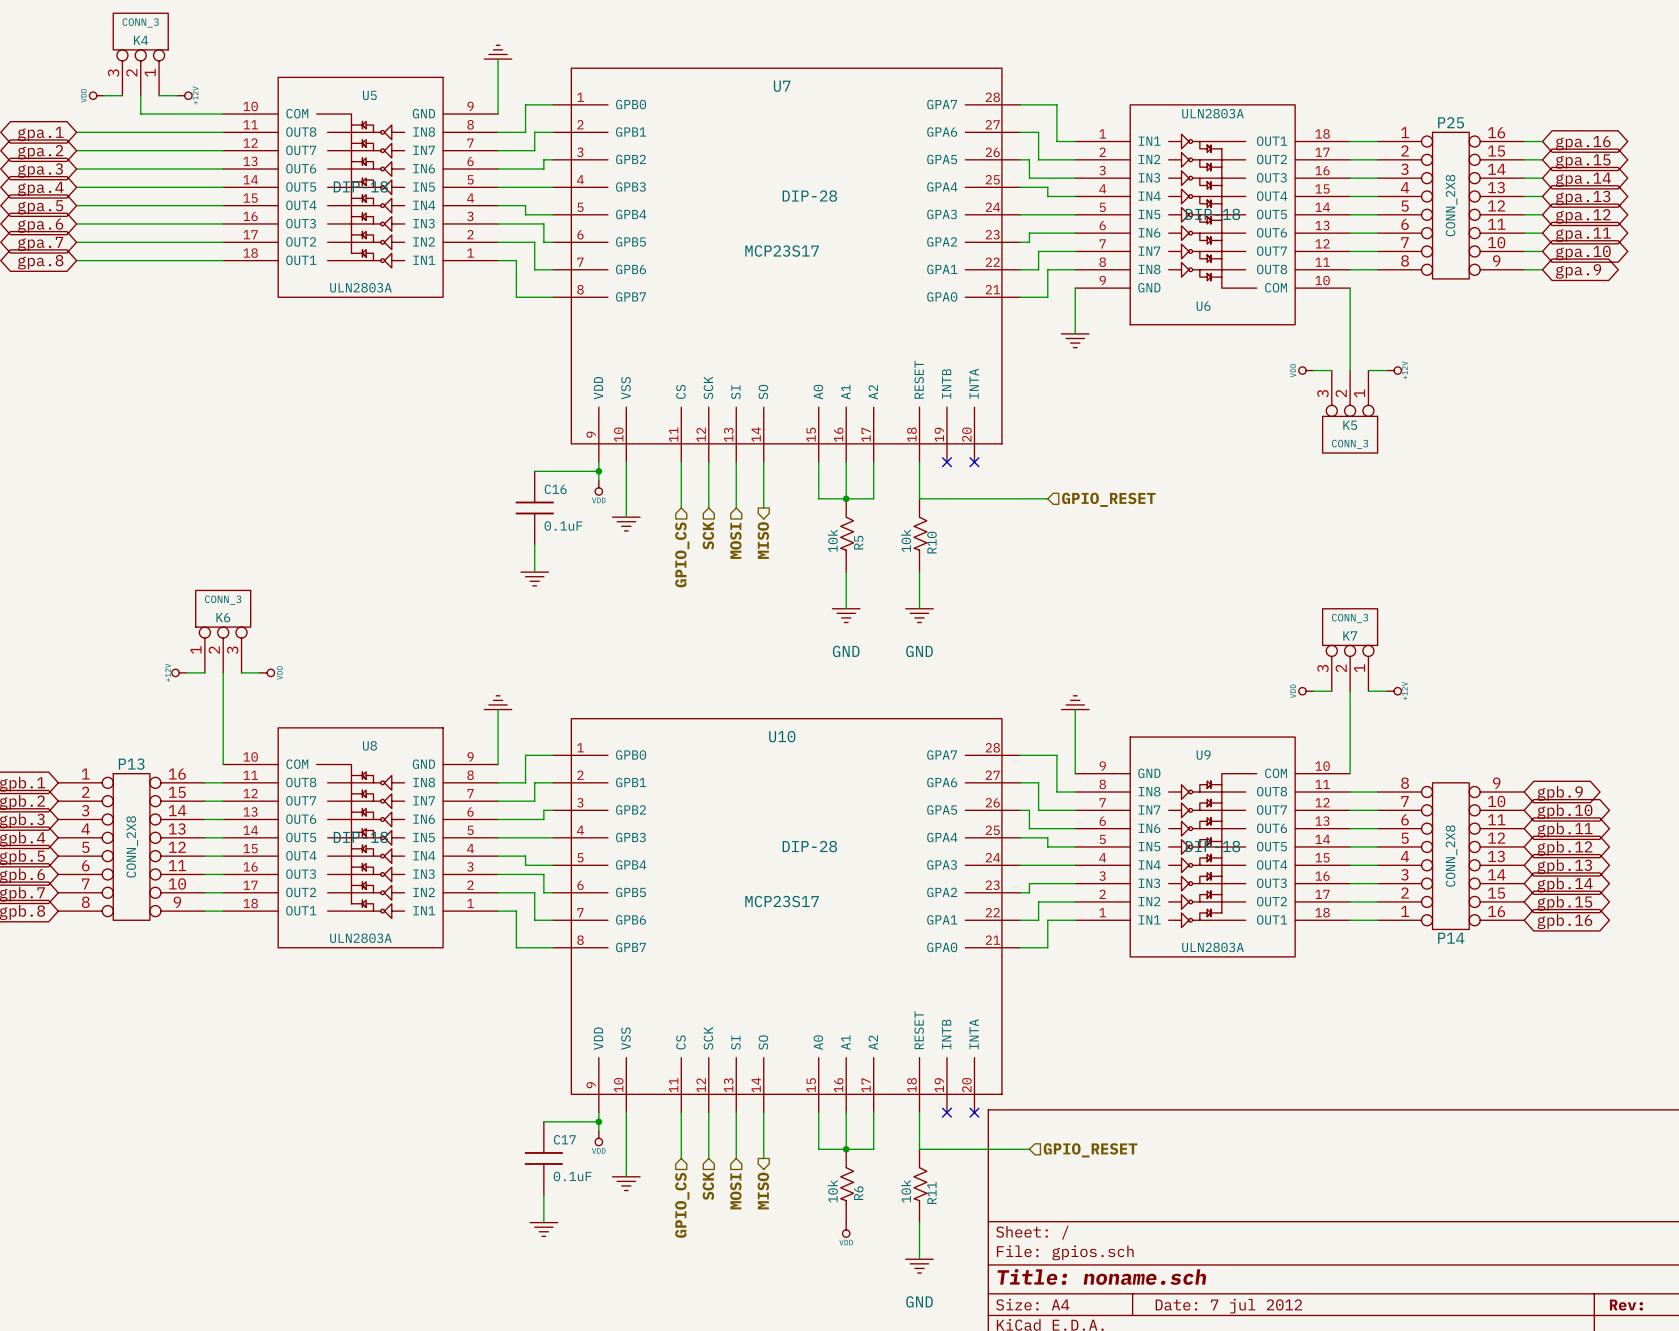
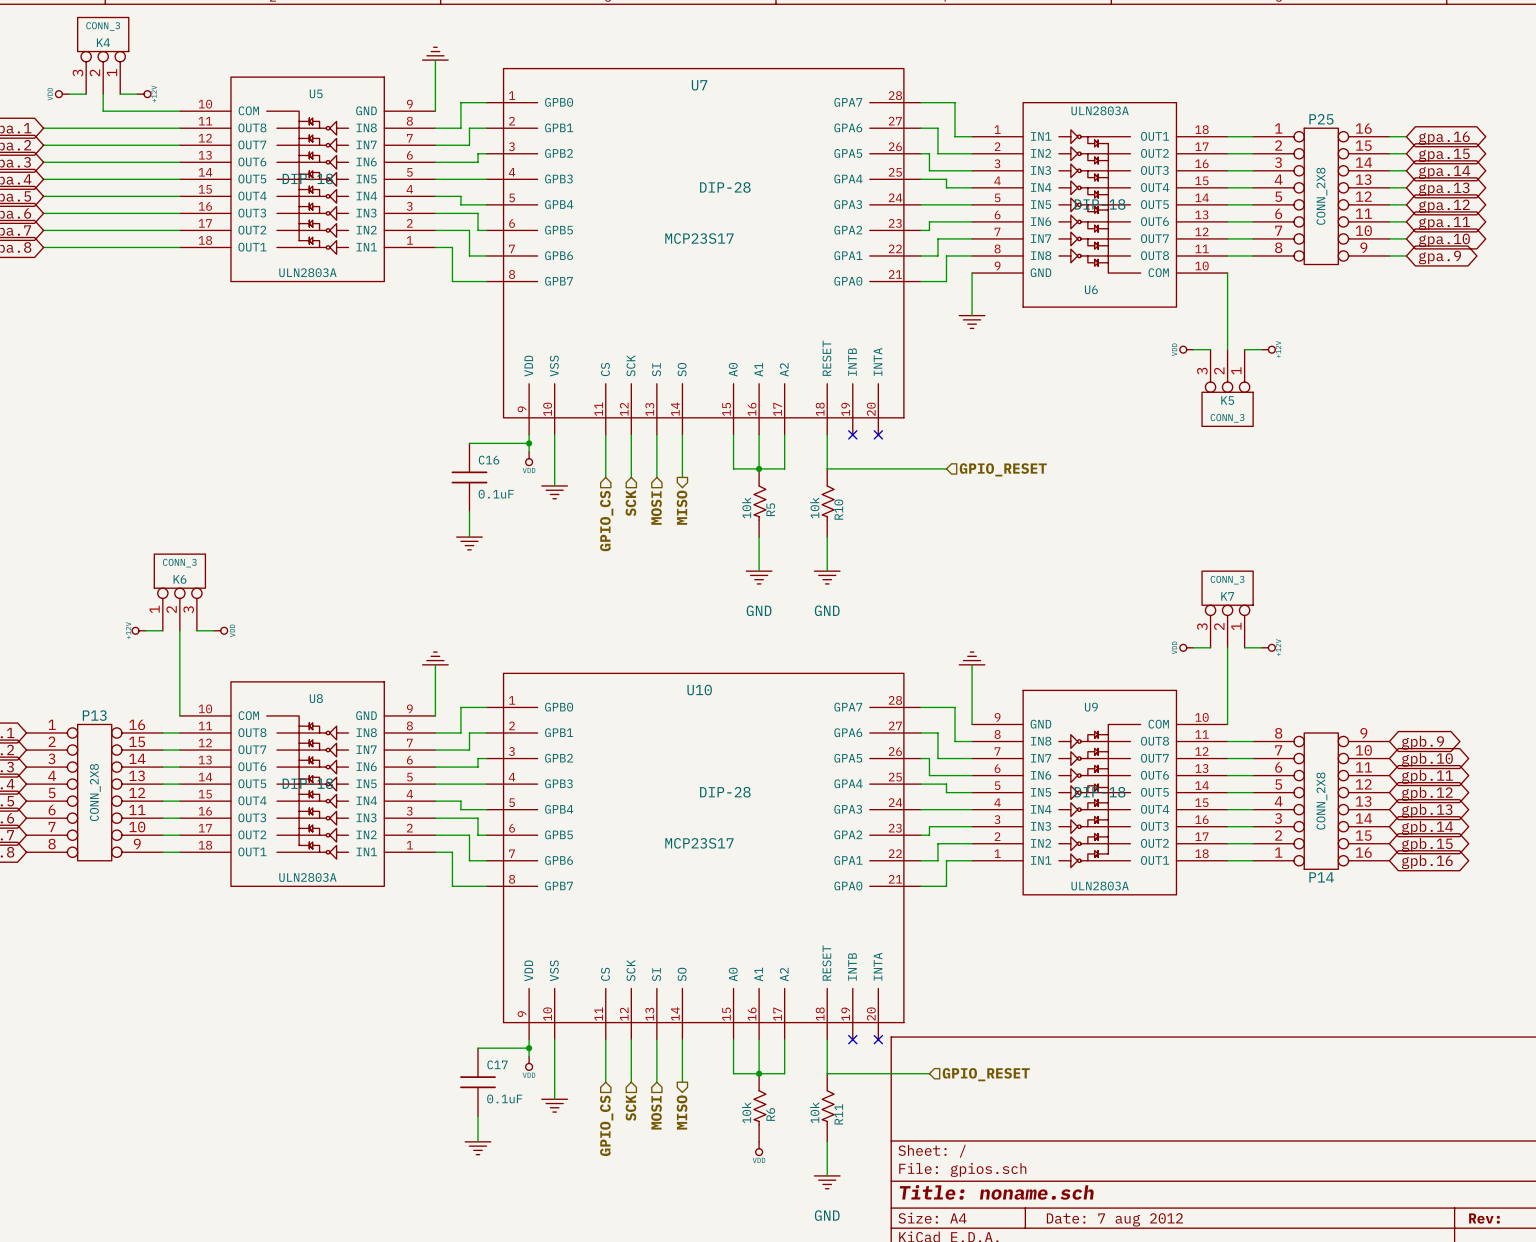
title block: Date: 7 jul 2012 (1228, 1306) -> Date: 7 aug 2012 (1114, 1219)

